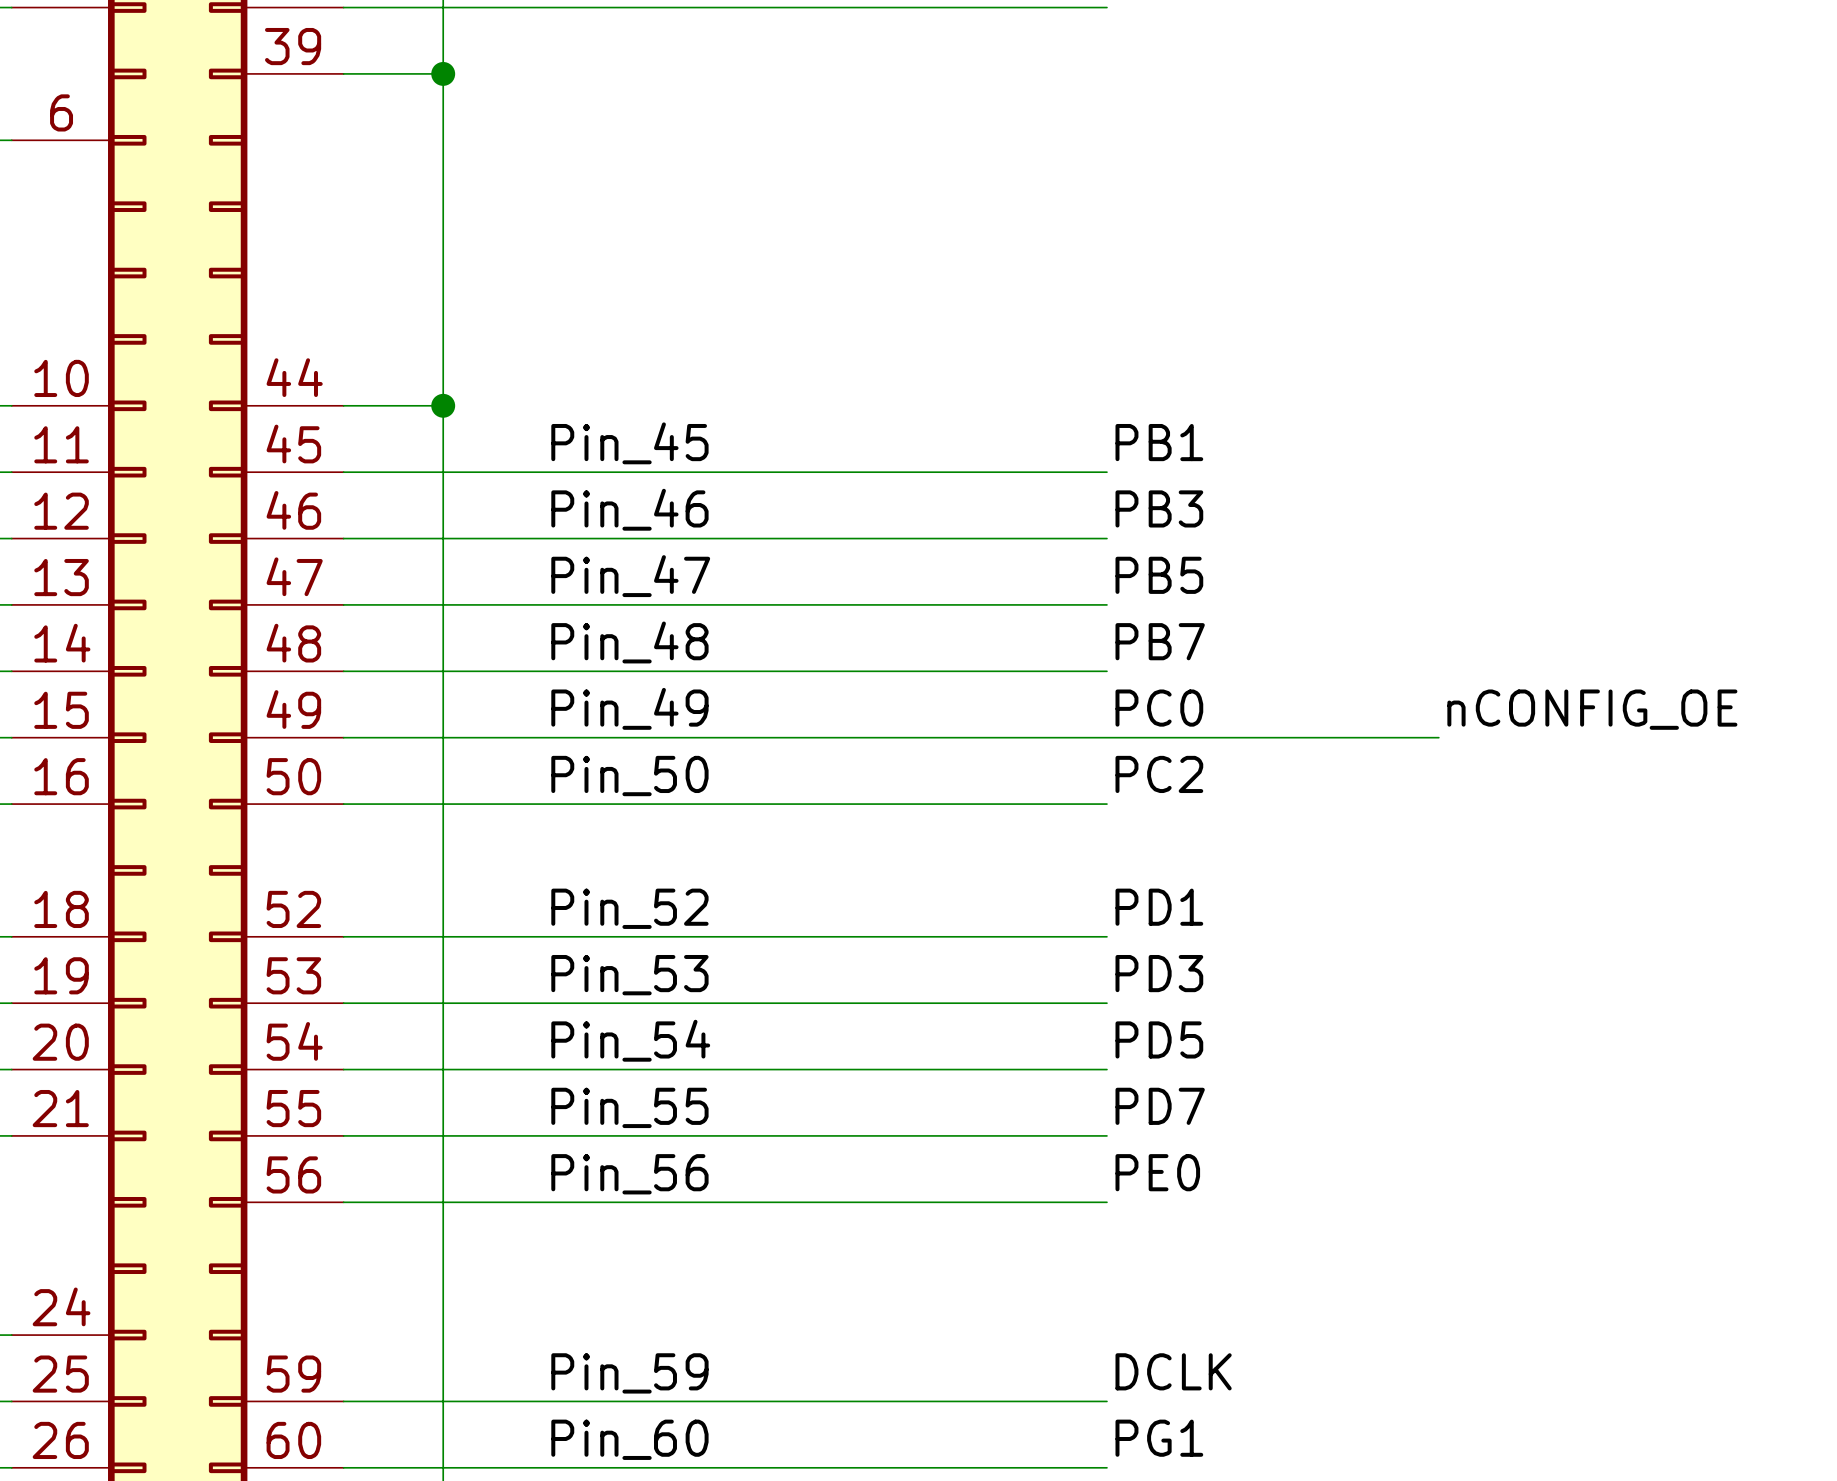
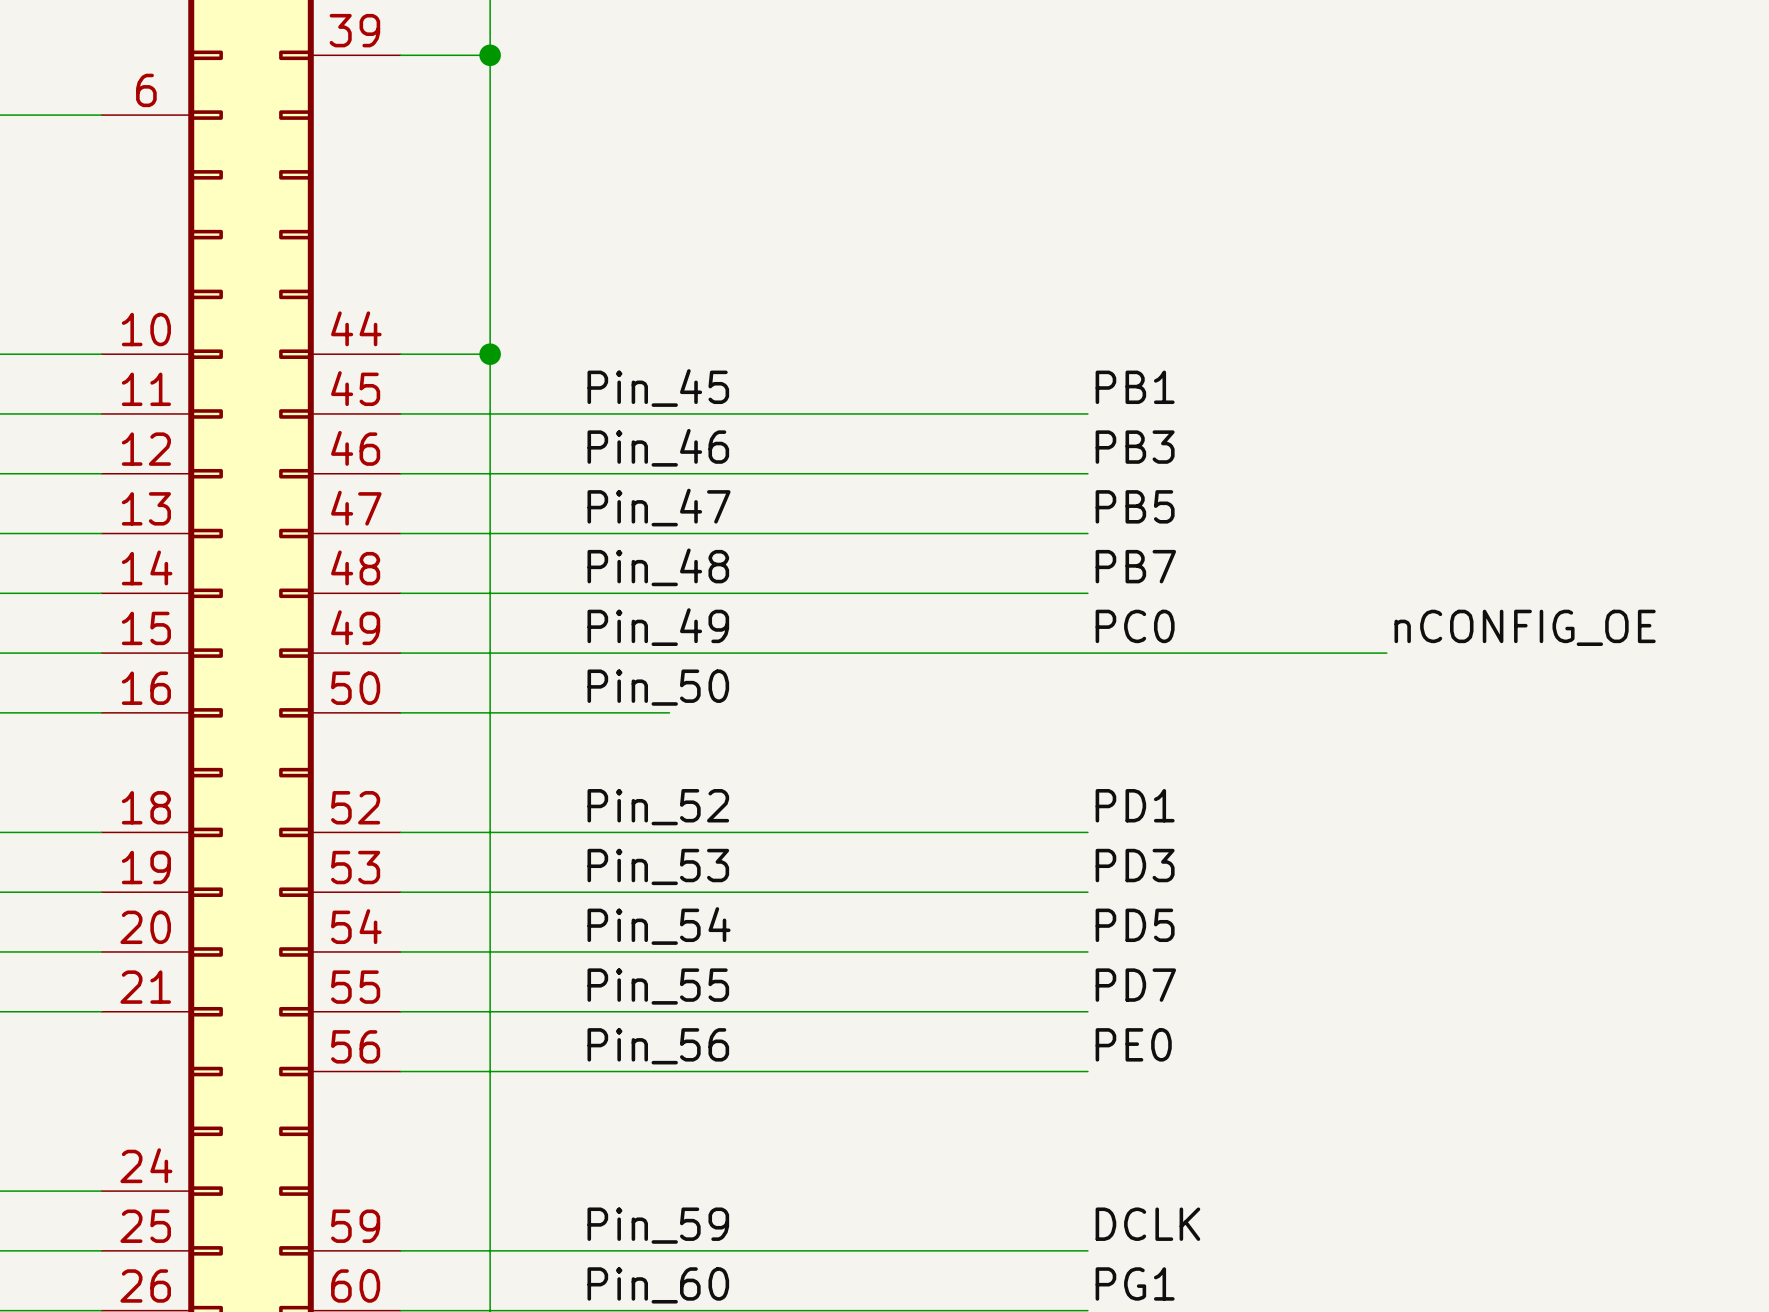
label: PC2 (1159, 774) -> none
wire: (642, 804) (1106, 804) -> none

